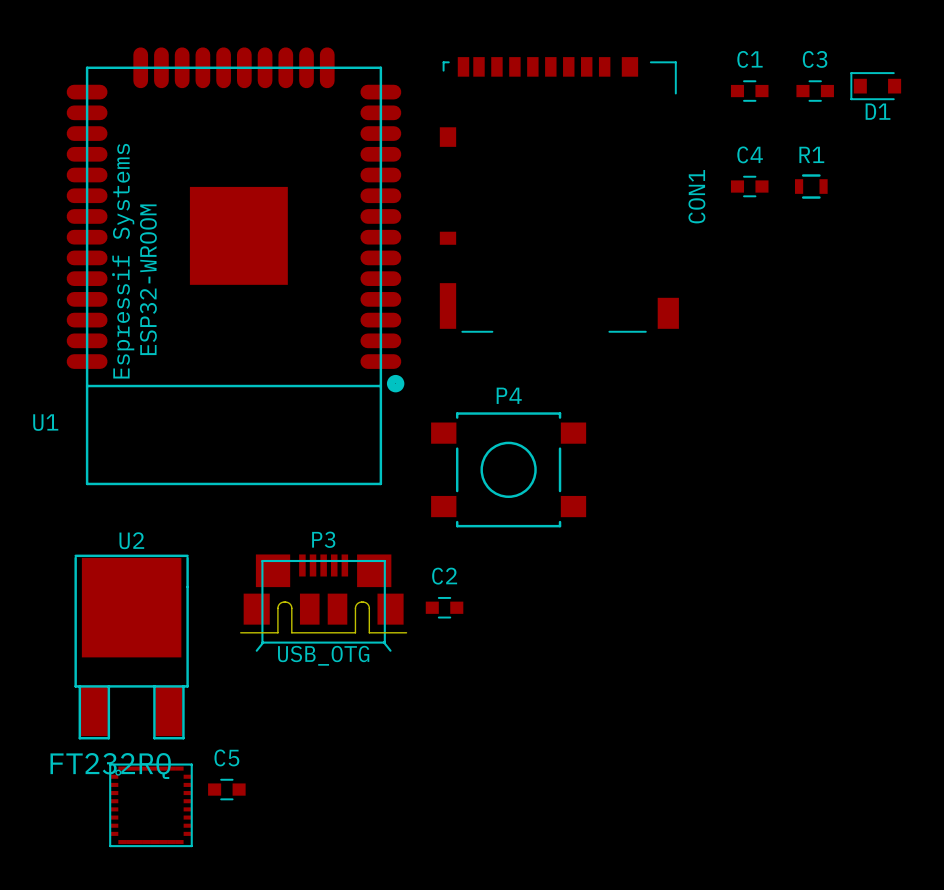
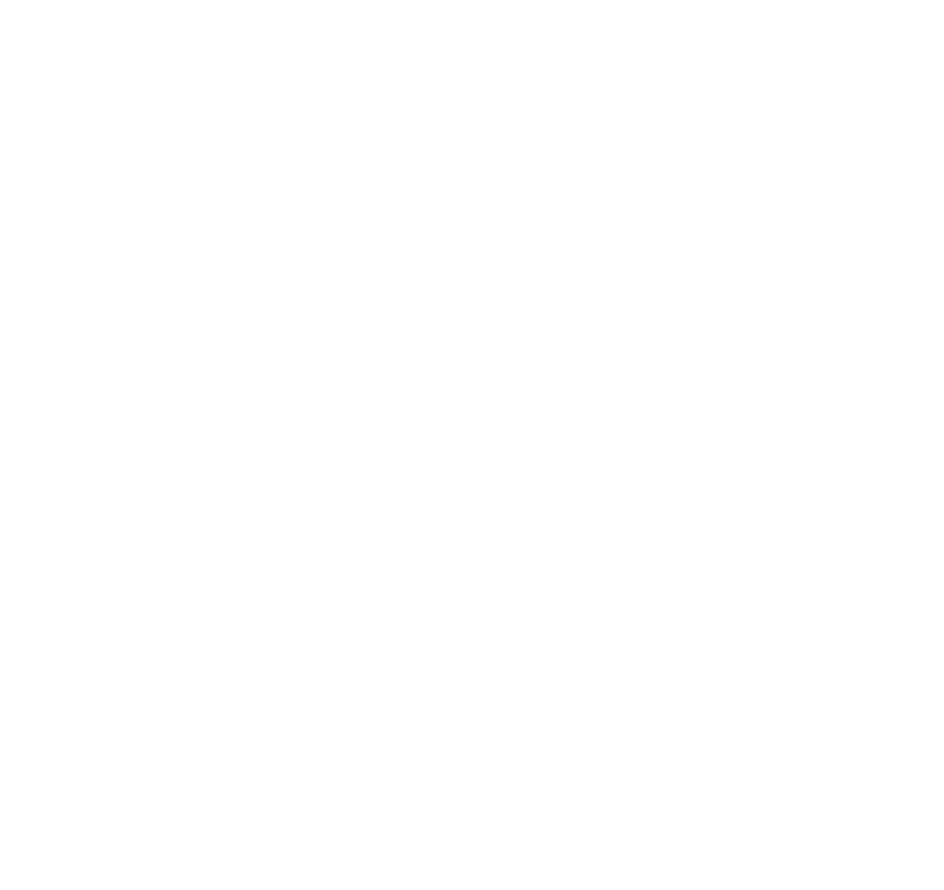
D1: (875, 86) -> none
C1: (749, 91) -> none
C3: (815, 91) -> none
C4: (749, 186) -> none
R1: (811, 186) -> none
CON1: (559, 194) -> none
U1: (235, 266) -> none
P4: (508, 469) -> none
P3: USB_OTG (323, 603) -> none
C2: (444, 607) -> none
U2: (131, 647) -> none
C5: (226, 789) -> none
part: FT232RQ (150, 805) -> none

